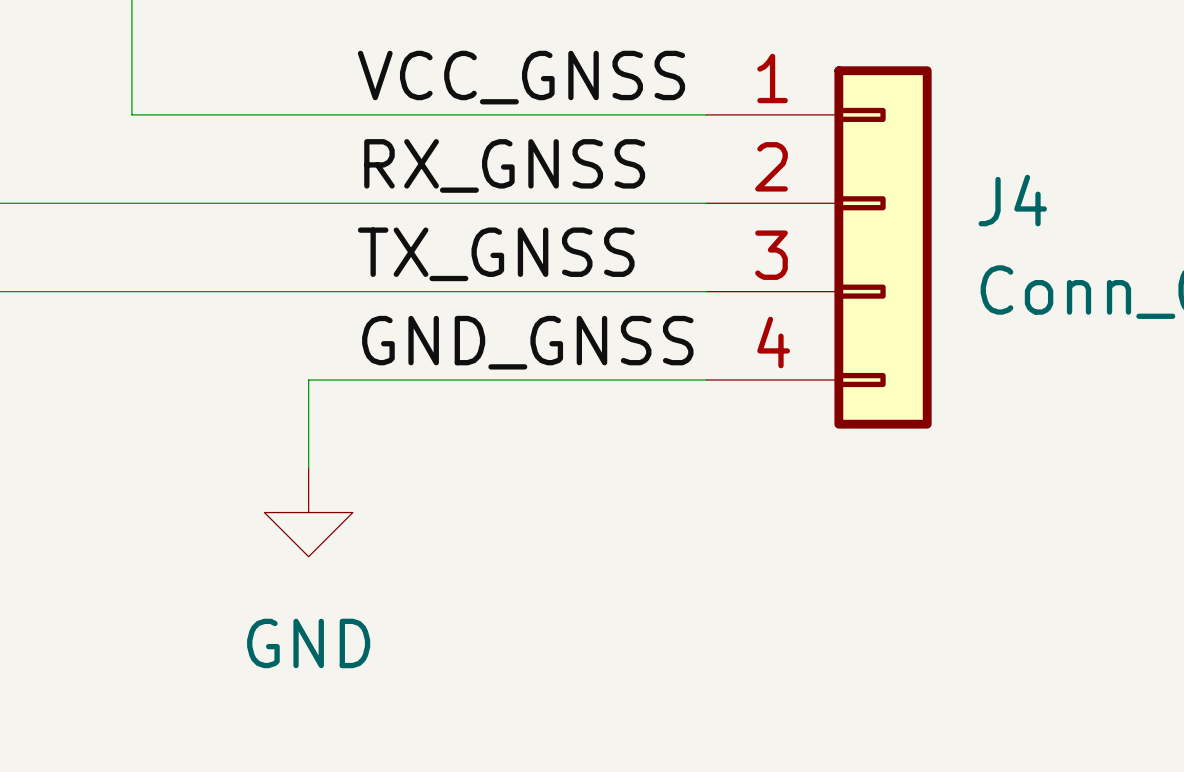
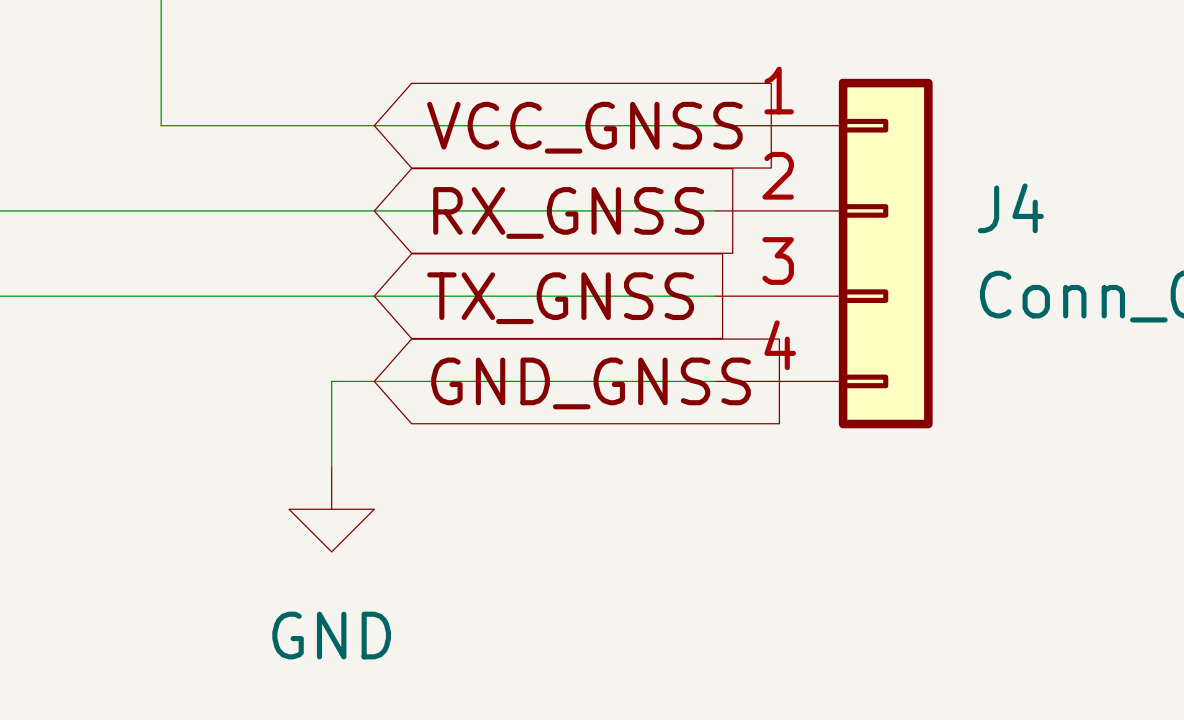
label: VCC_GNSS (521, 77) -> none
global label: none -> VCC_GNSS (584, 127)
label: RX_GNSS (504, 165) -> none
global label: none -> RX_GNSS (568, 212)
label: TX_GNSS (496, 254) -> none
global label: none -> TX_GNSS (560, 298)
label: GND_GNSS (527, 342) -> none
global label: none -> GND_GNSS (591, 383)

